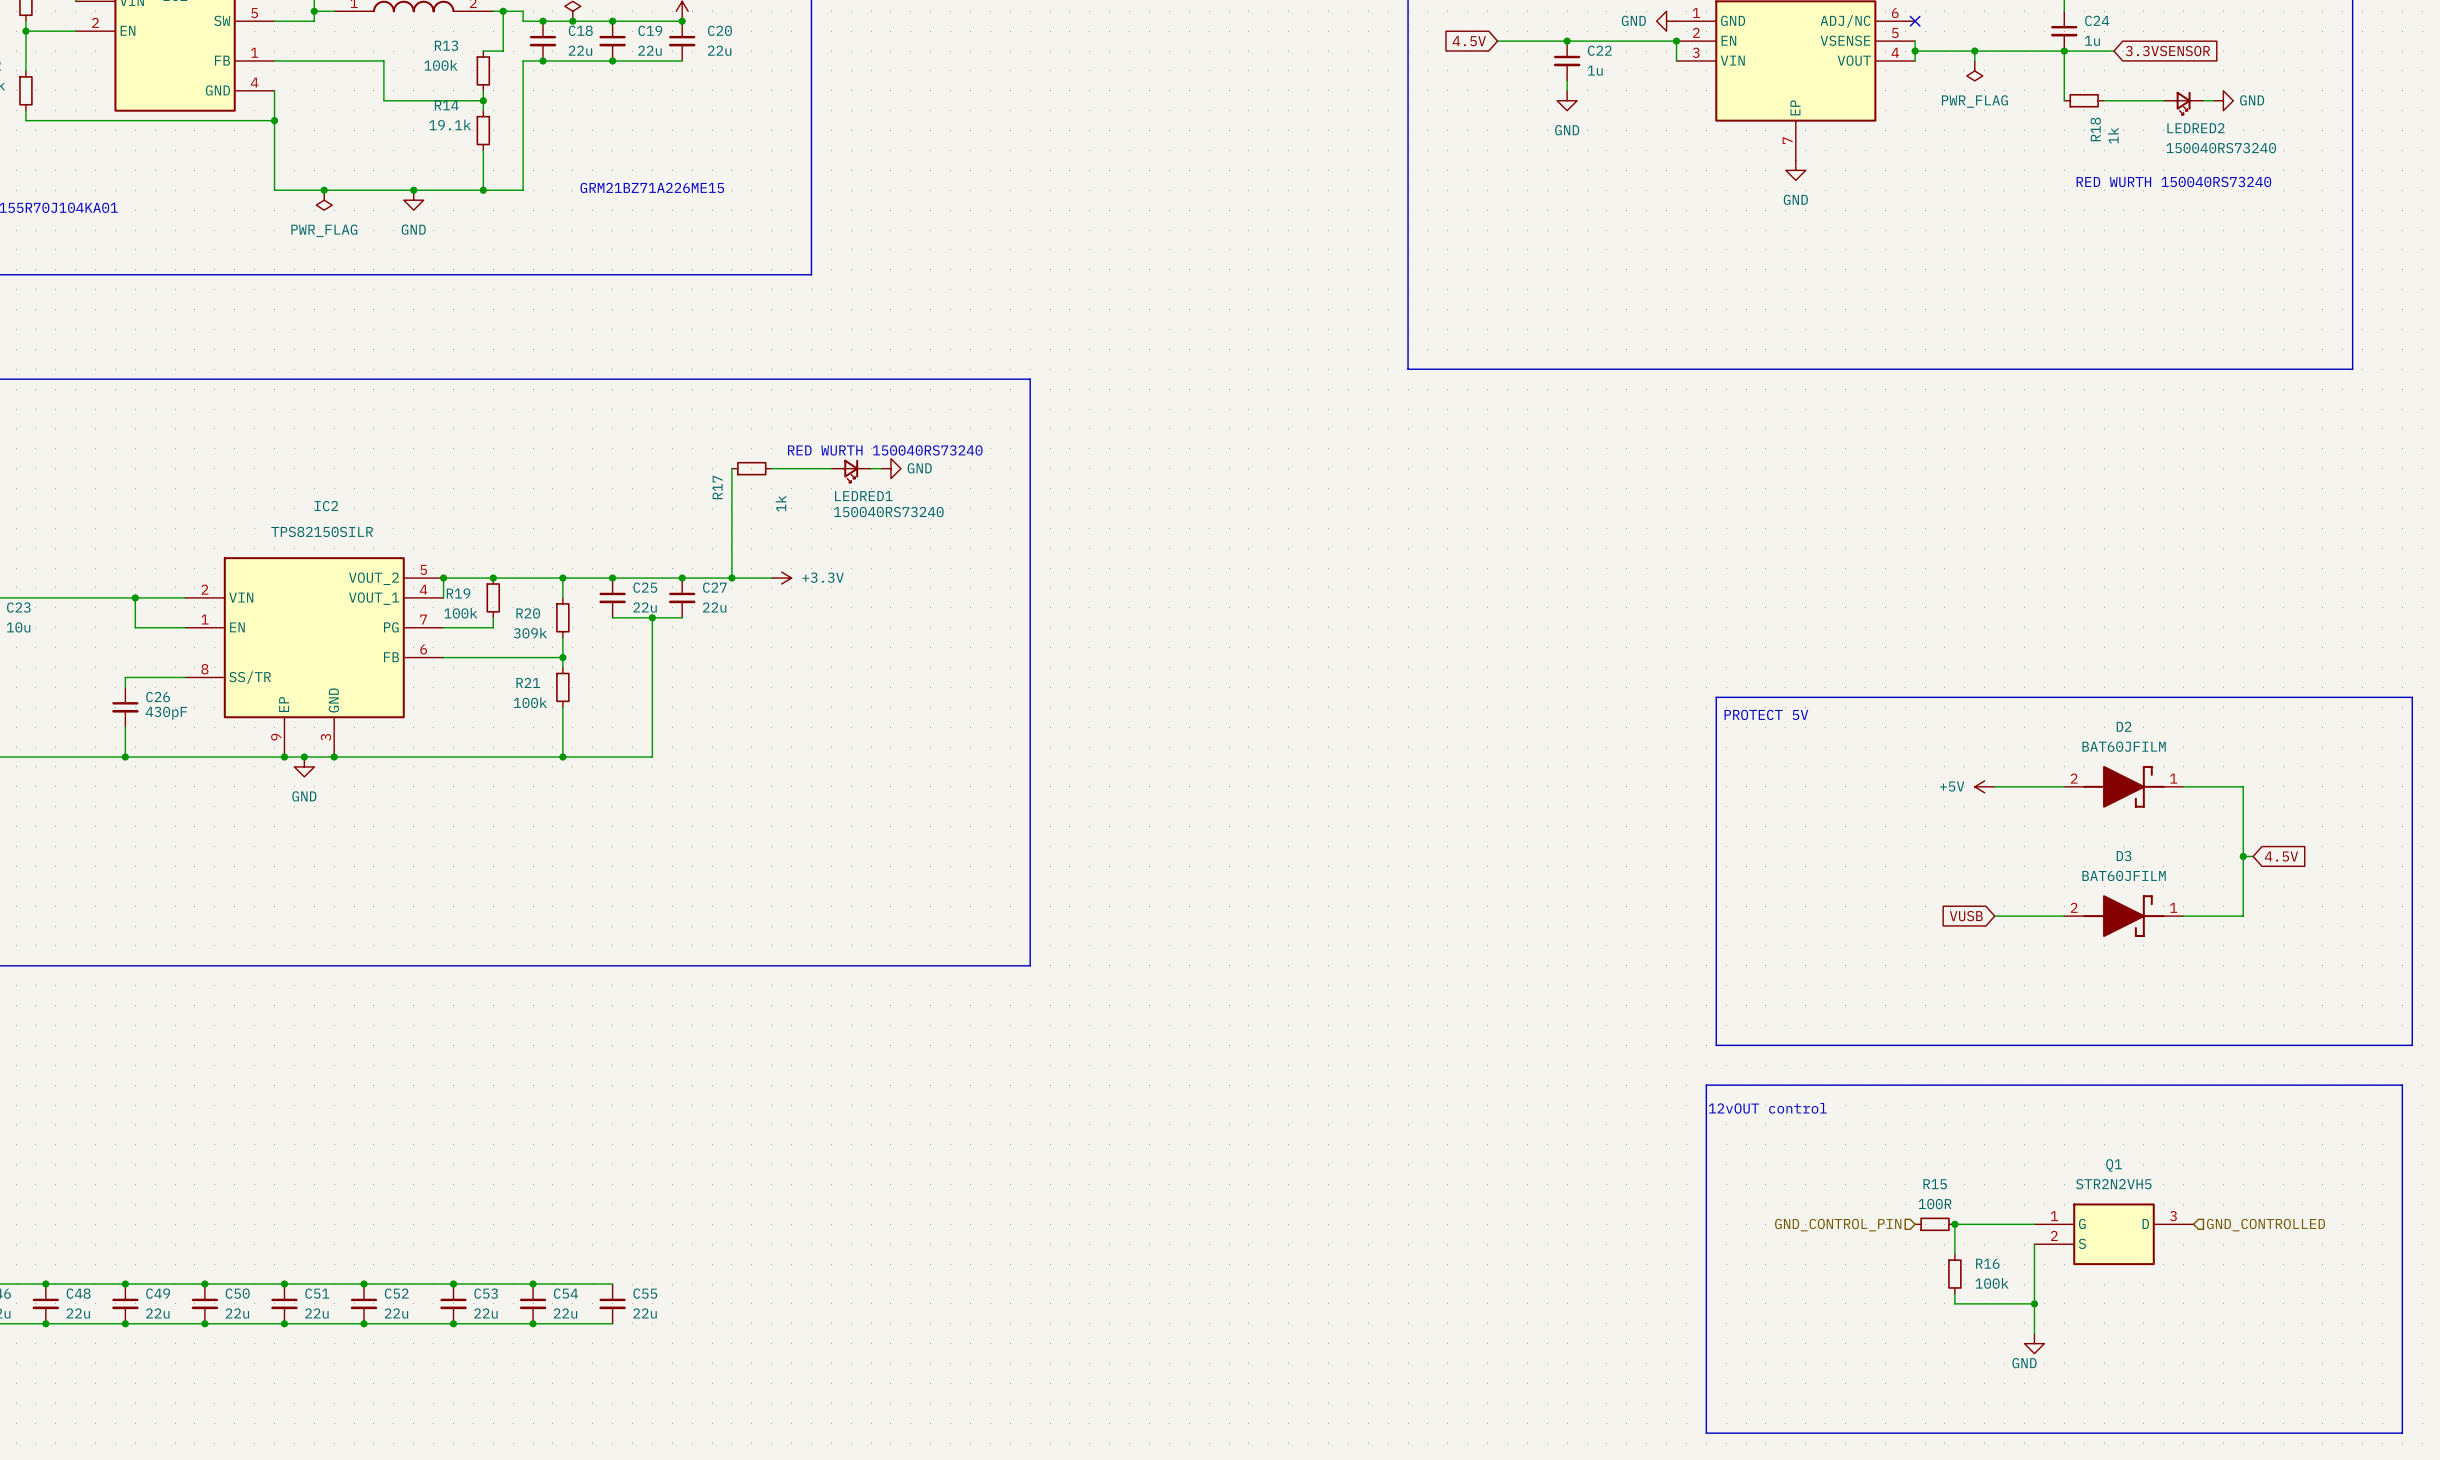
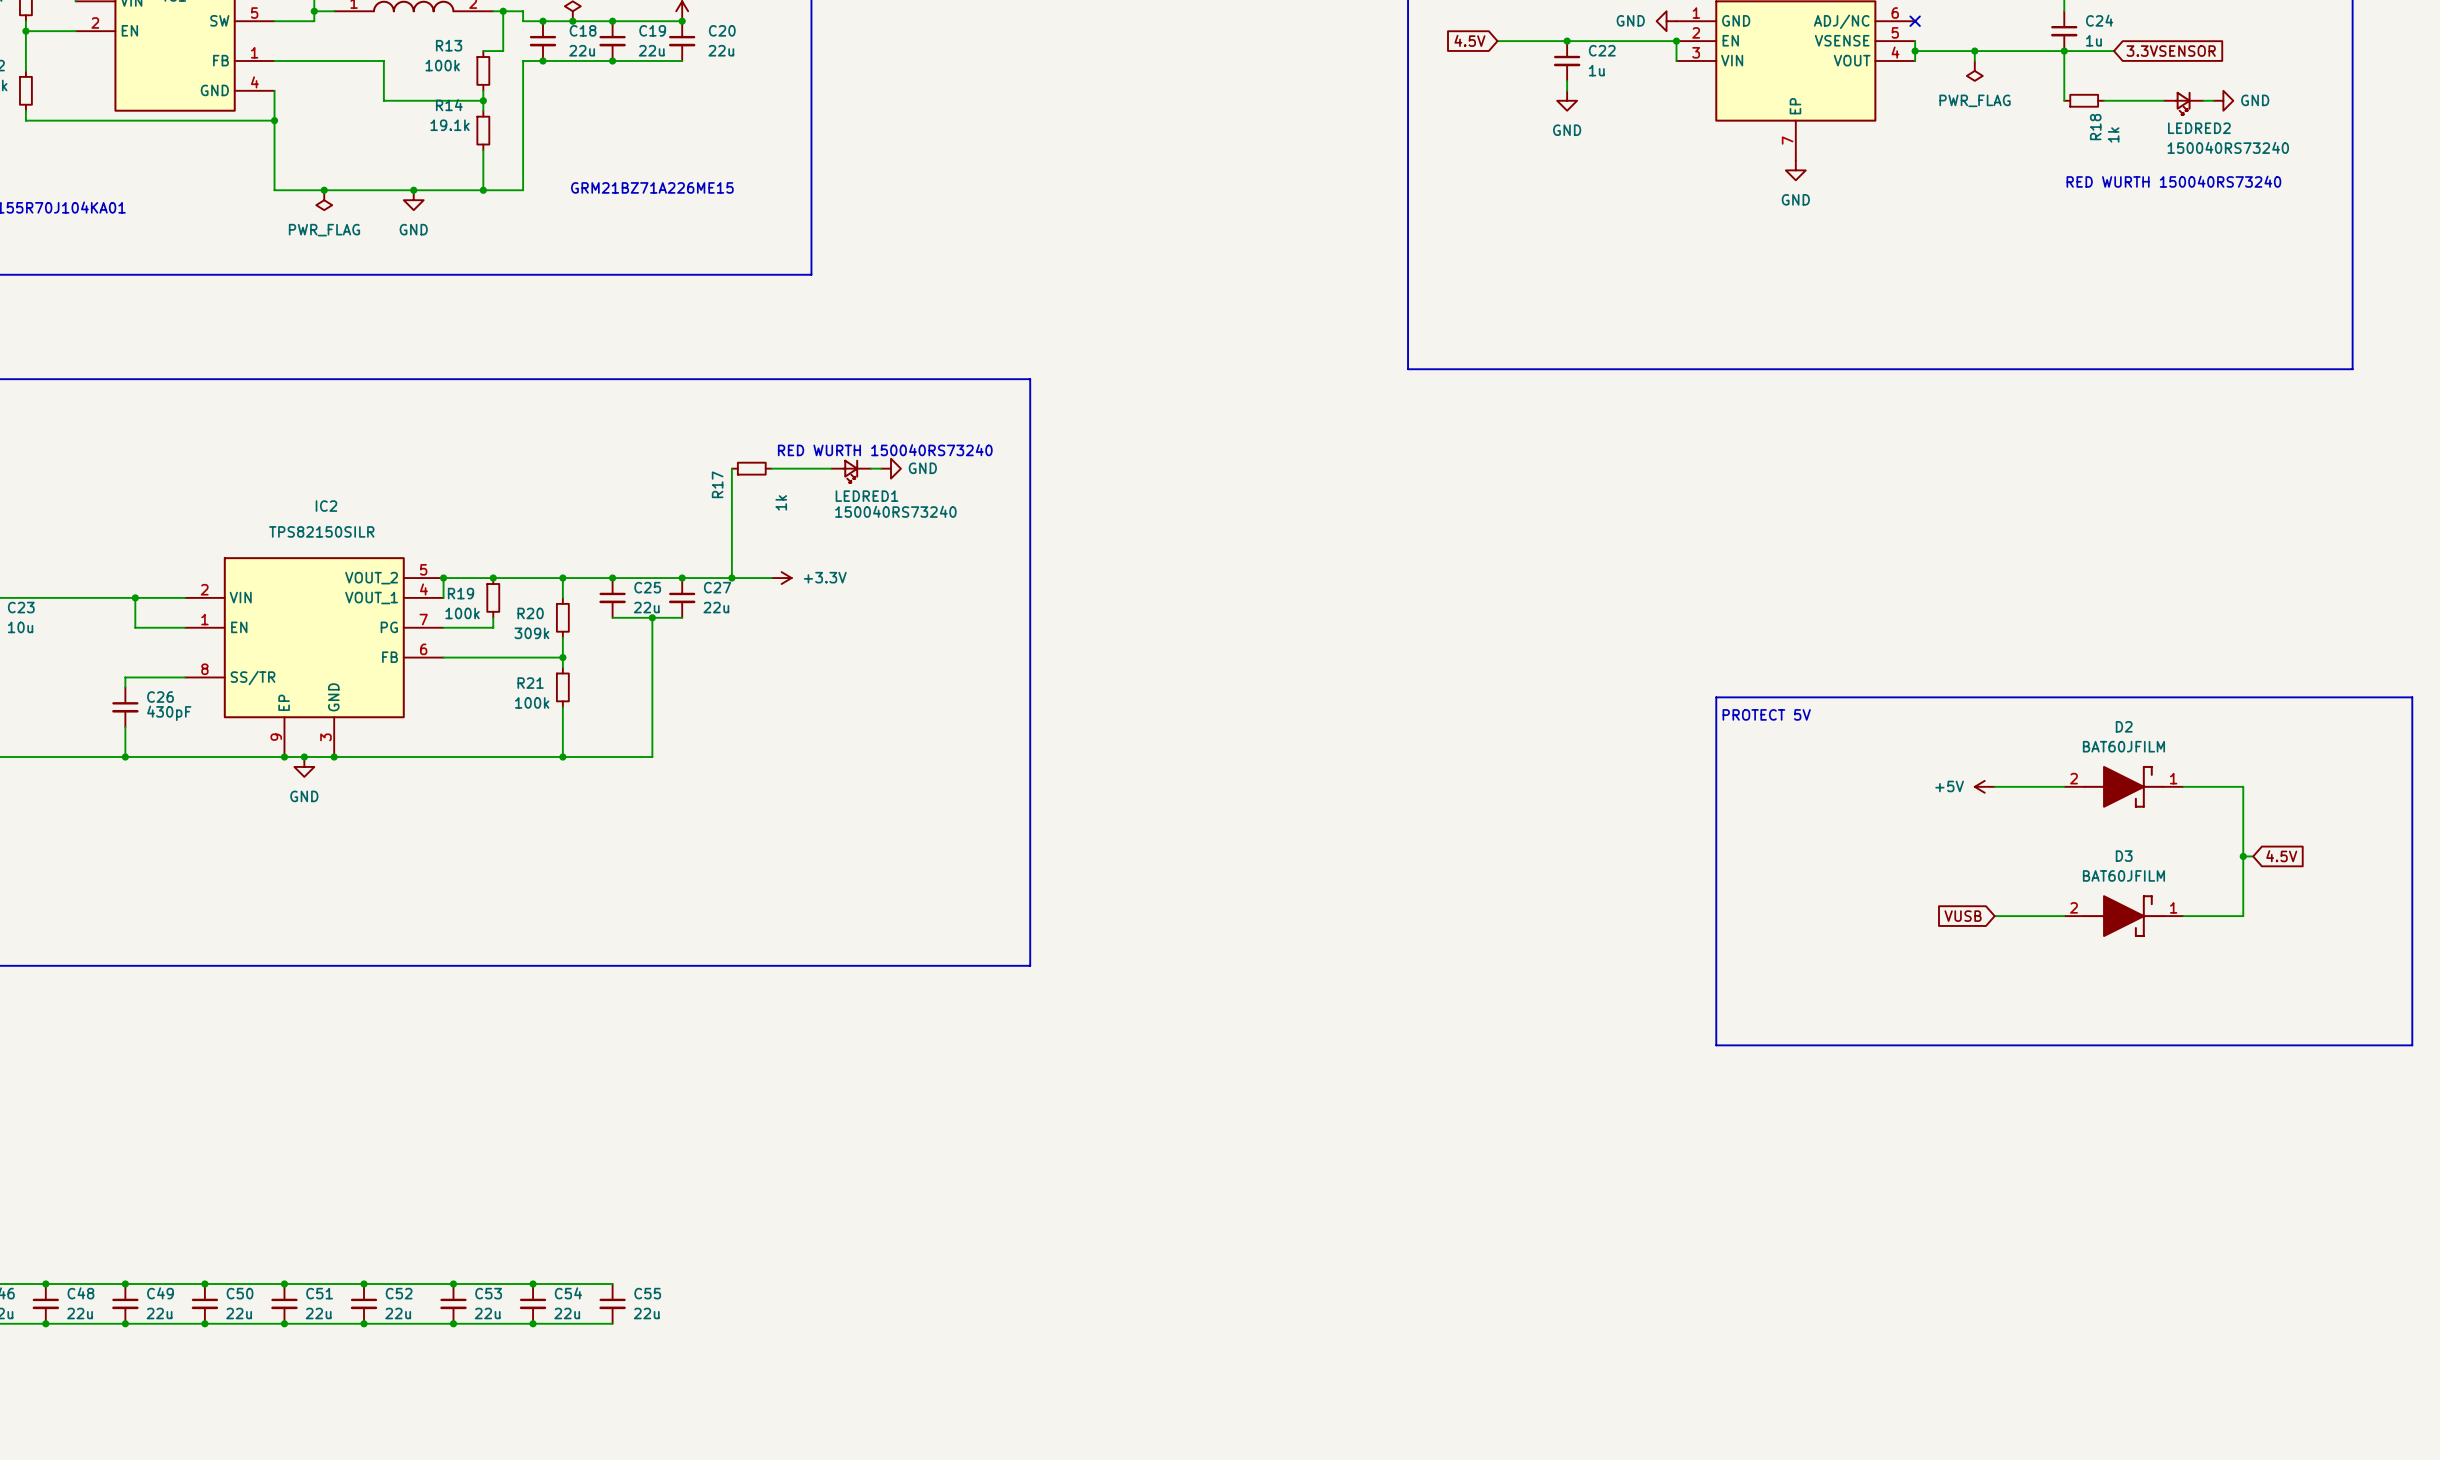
line: (1706, 1085) (2402, 1085) (2402, 1433) (1706, 1433) (1706, 1085) -> none
text: 12vOUT control (1767, 1108) -> none
R15: 100R (1935, 1224) -> none
junction: (1954, 1224) -> none
wire: (2034, 1224) (1954, 1224) (1954, 1254) -> none
hierarchical label: GND_CONTROL_PIN (1838, 1225) -> none
hierarchical label: GND_CONTROLLED (2266, 1225) -> none
Q1: STR2N2VH5 (2114, 1234) -> none
wire: (2034, 1244) (2034, 1333) -> none
R16: 100k (1954, 1274) -> none
wire: (1954, 1293) (1954, 1303) (2034, 1303) -> none
junction: (2034, 1303) -> none
power symbol: GND (2034, 1343) -> none

